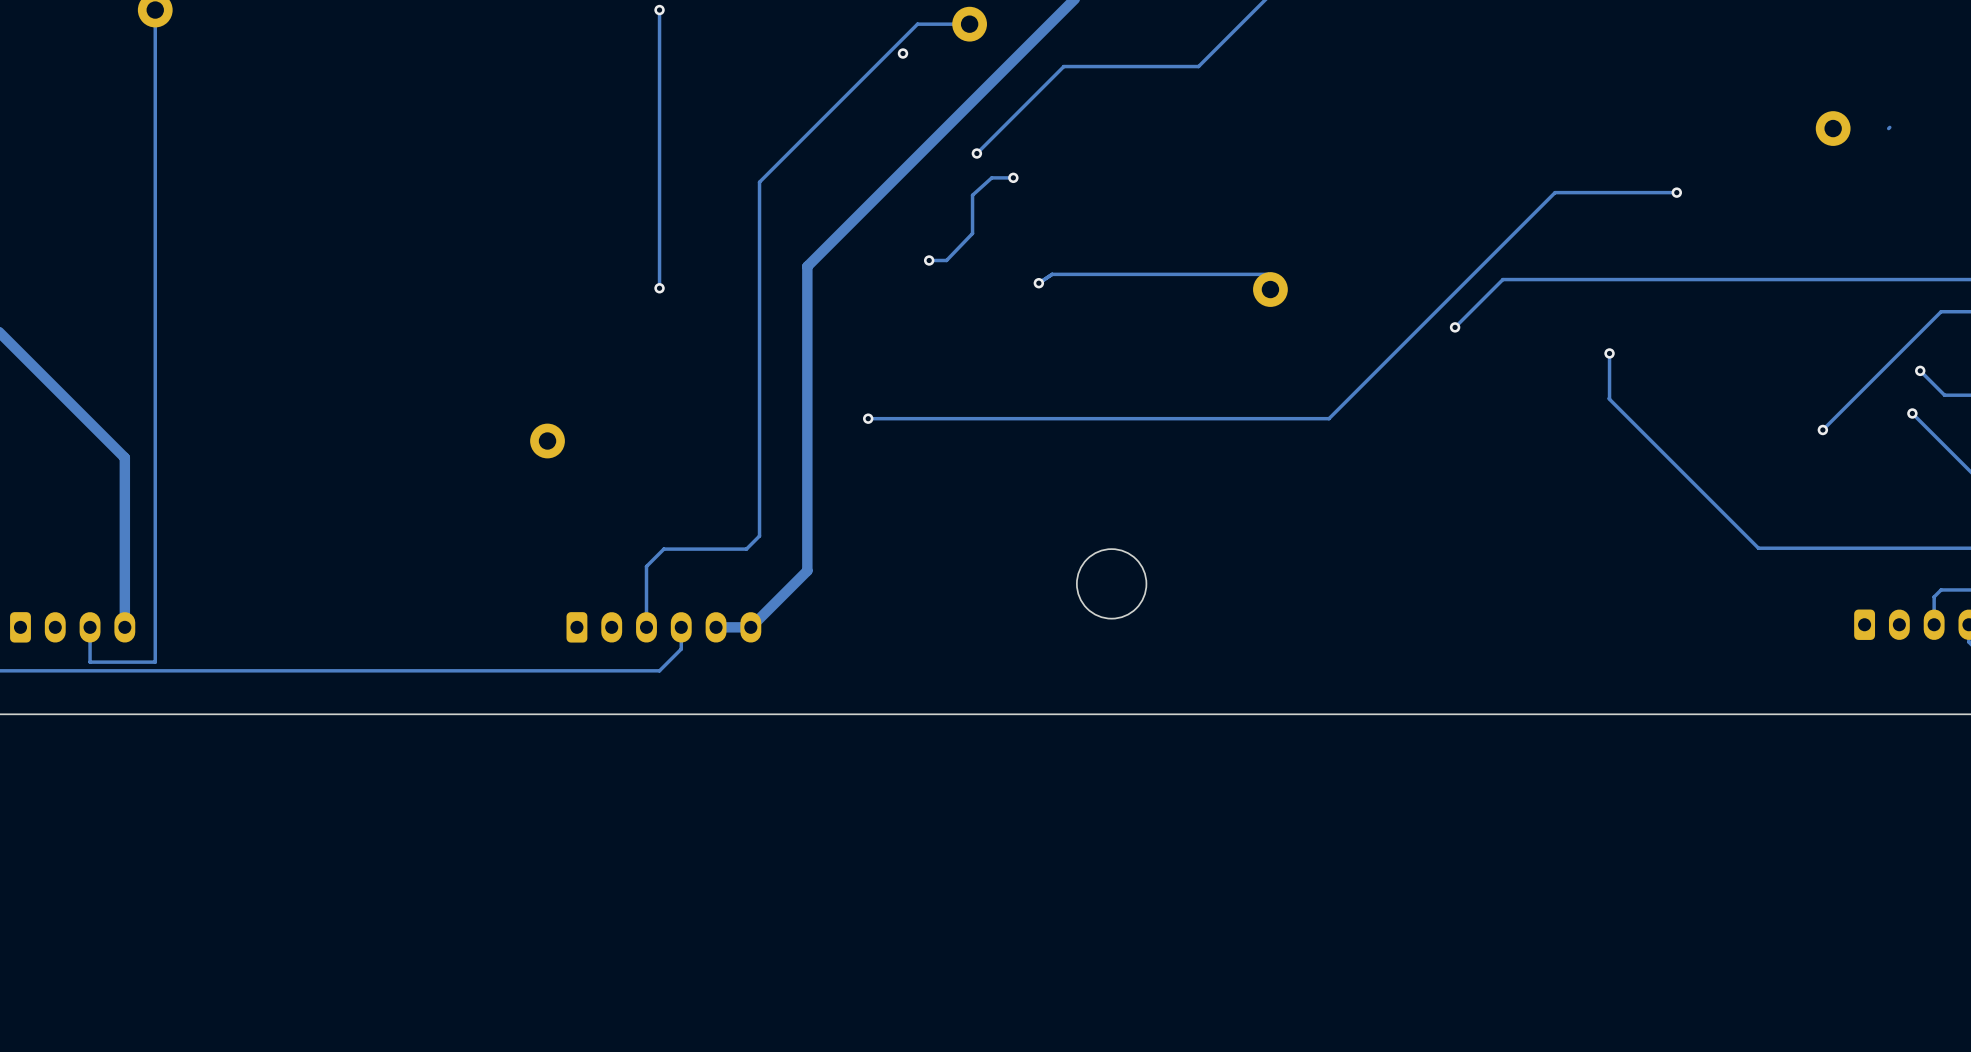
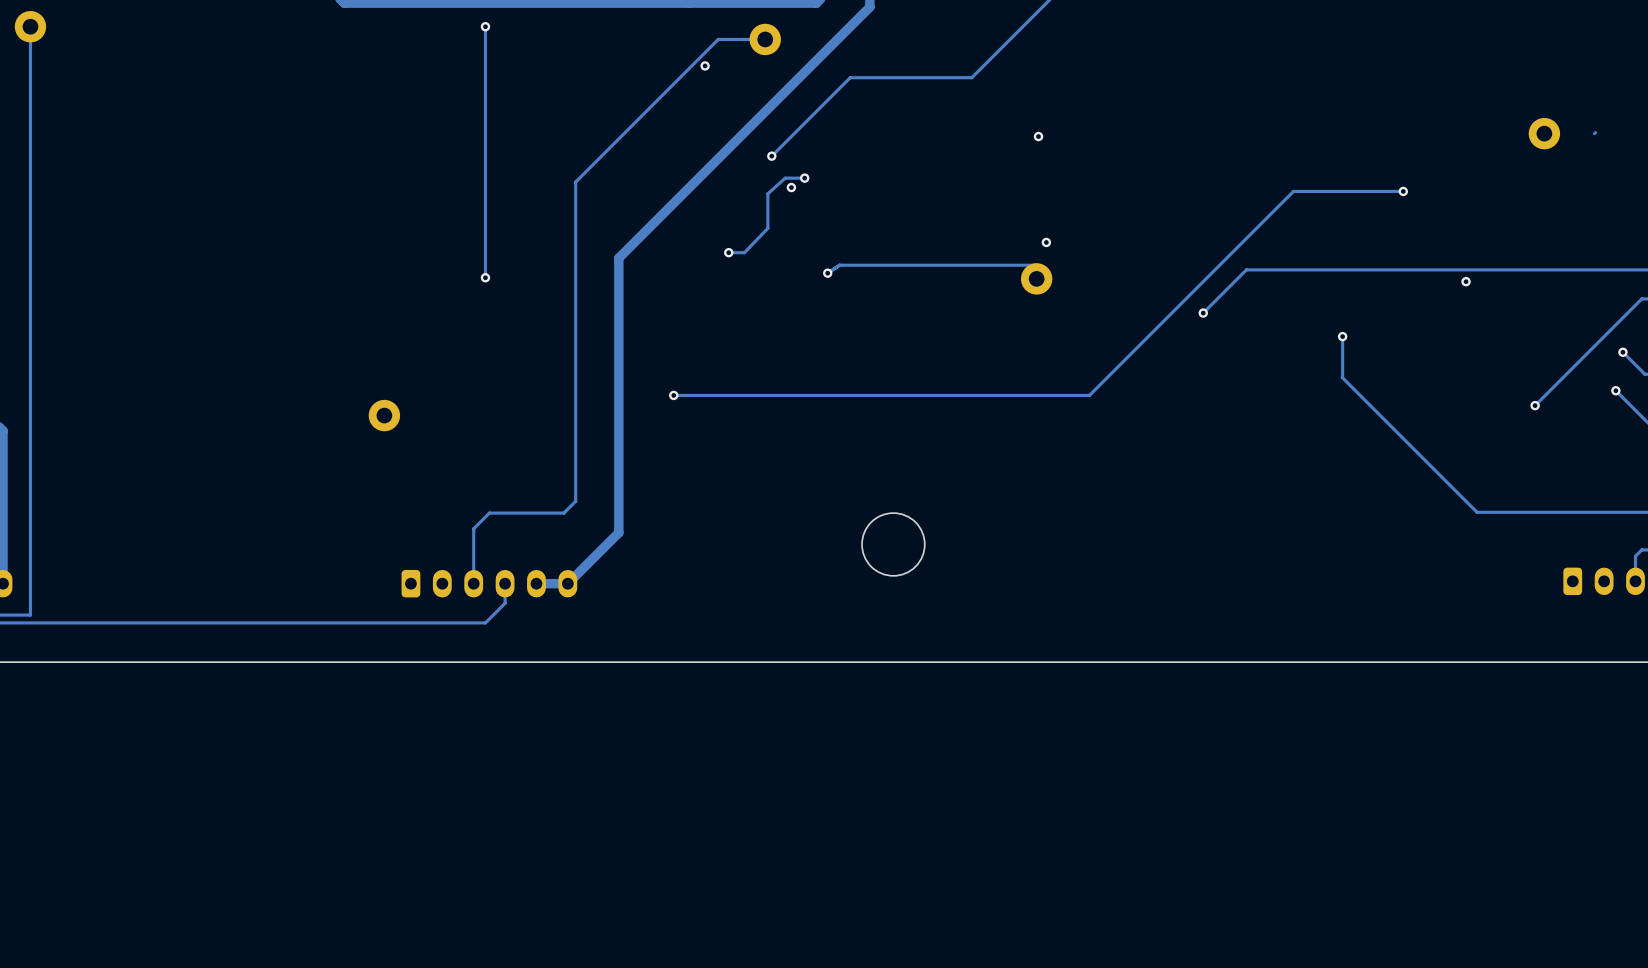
via: none -> (1038, 136)
via: none -> (791, 187)
via: none -> (1046, 242)
via: none -> (1466, 281)

